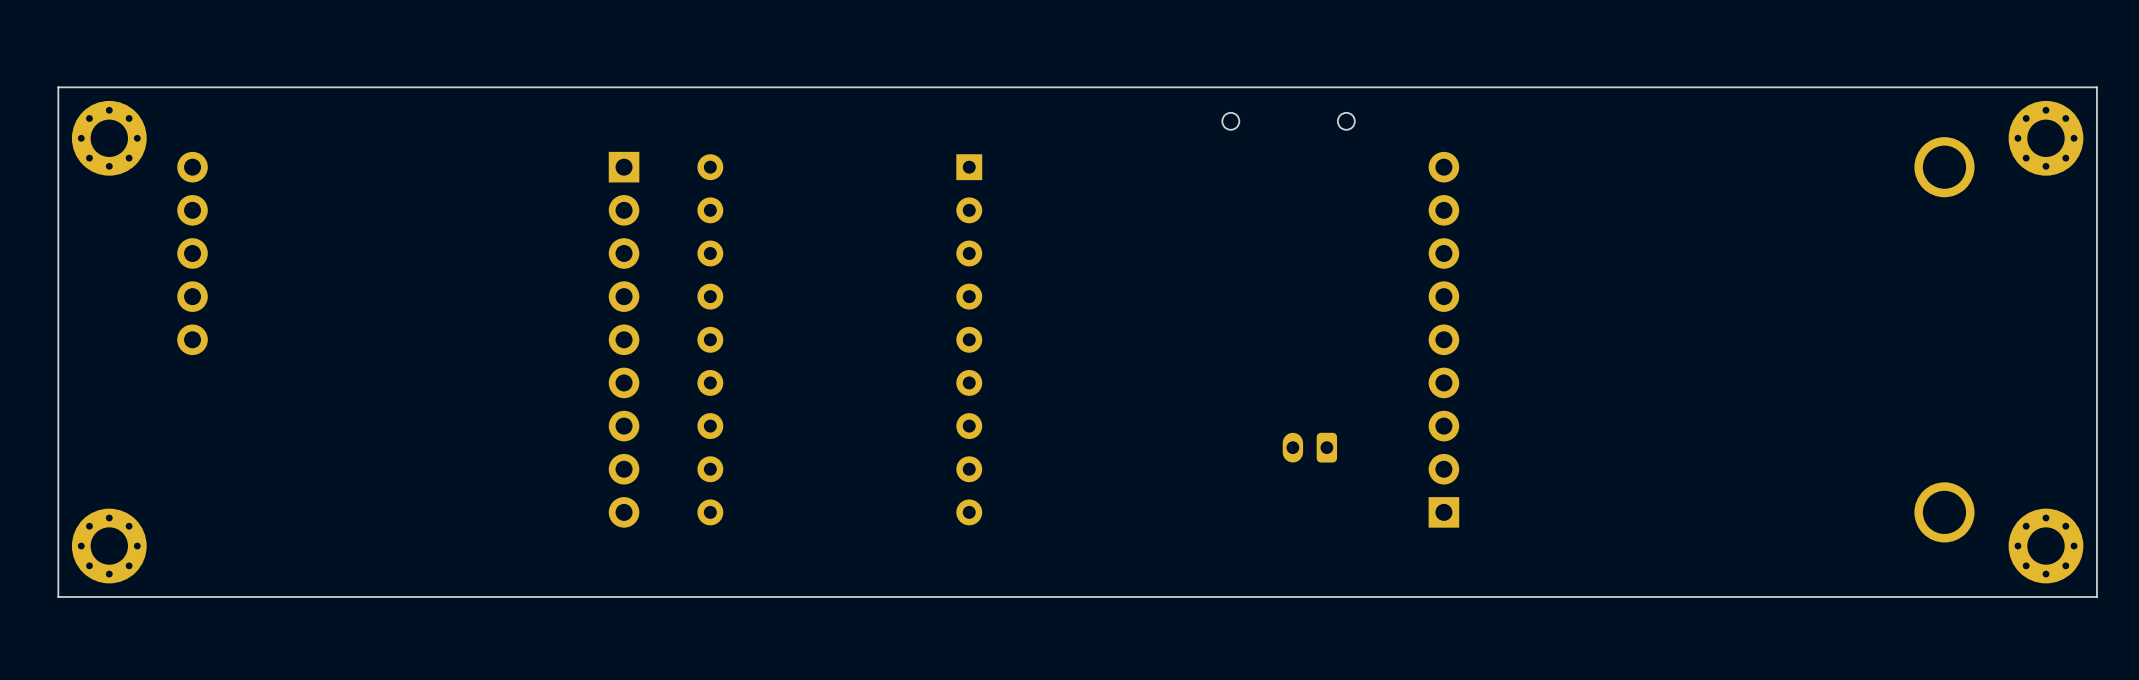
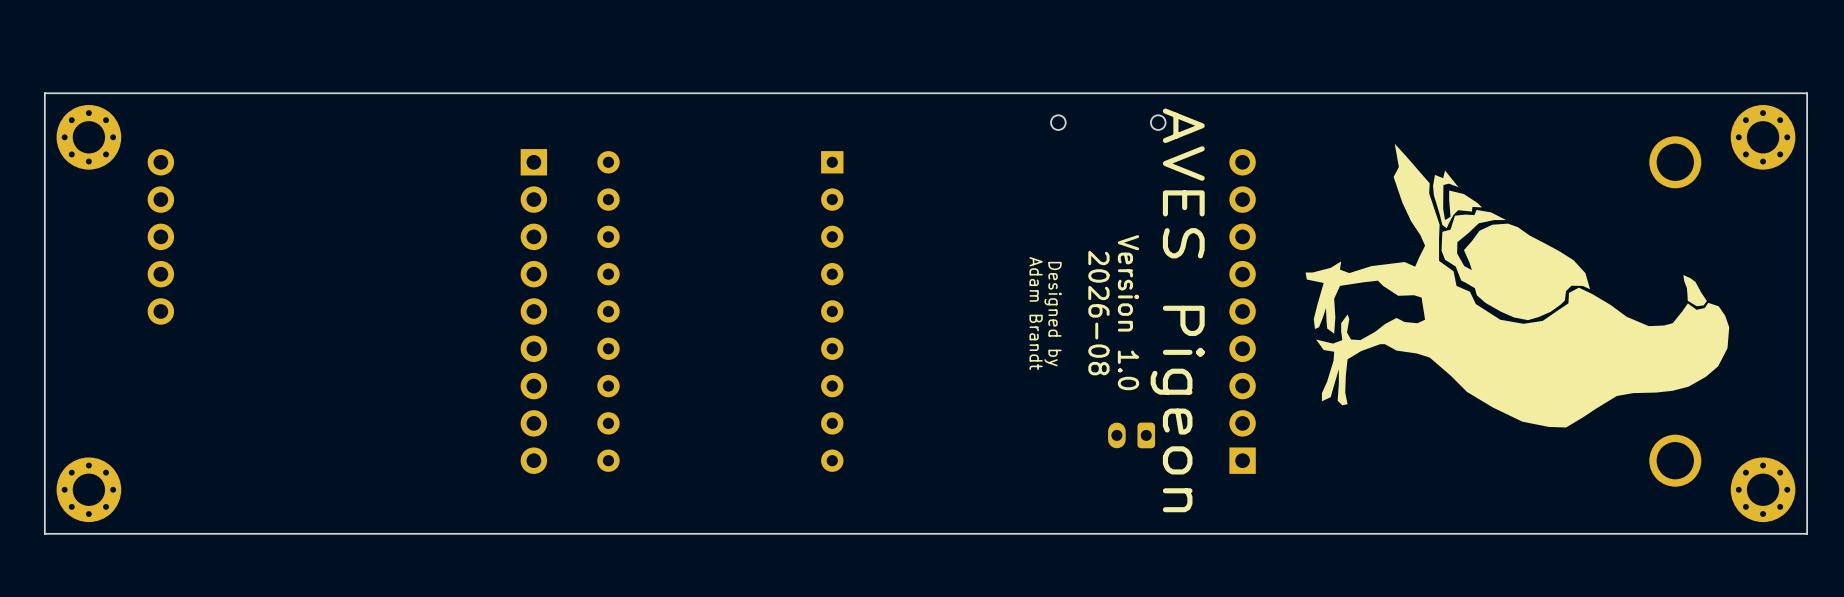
drawing: none -> [1305, 143, 1730, 428]
text: none -> AVES Pigeon (1177, 310)
text: none -> 2026-08 (1098, 313)
text: none -> Version 1.0 (1128, 312)
text: none -> Adam Brandt (1036, 313)
text: none -> Designed by (1053, 314)
part position: (1309, 447) -> (1131, 435)

